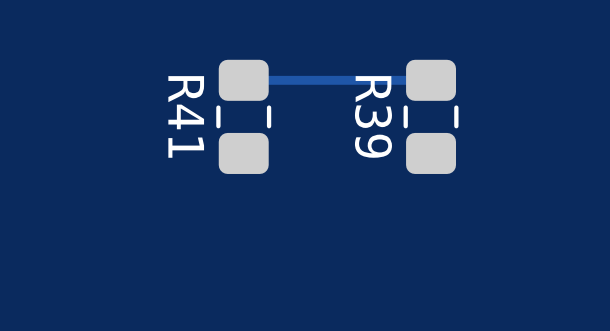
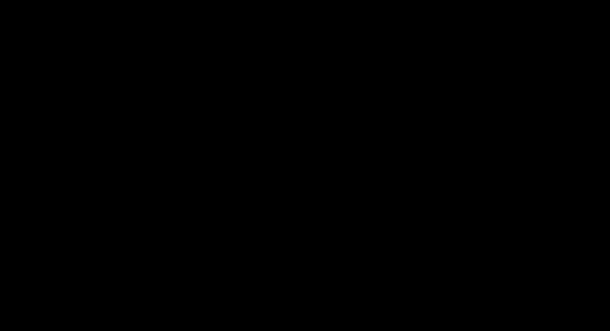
track: (431, 80) (243, 80) -> none
R41: (243, 116) -> none
R39: (431, 116) -> none

